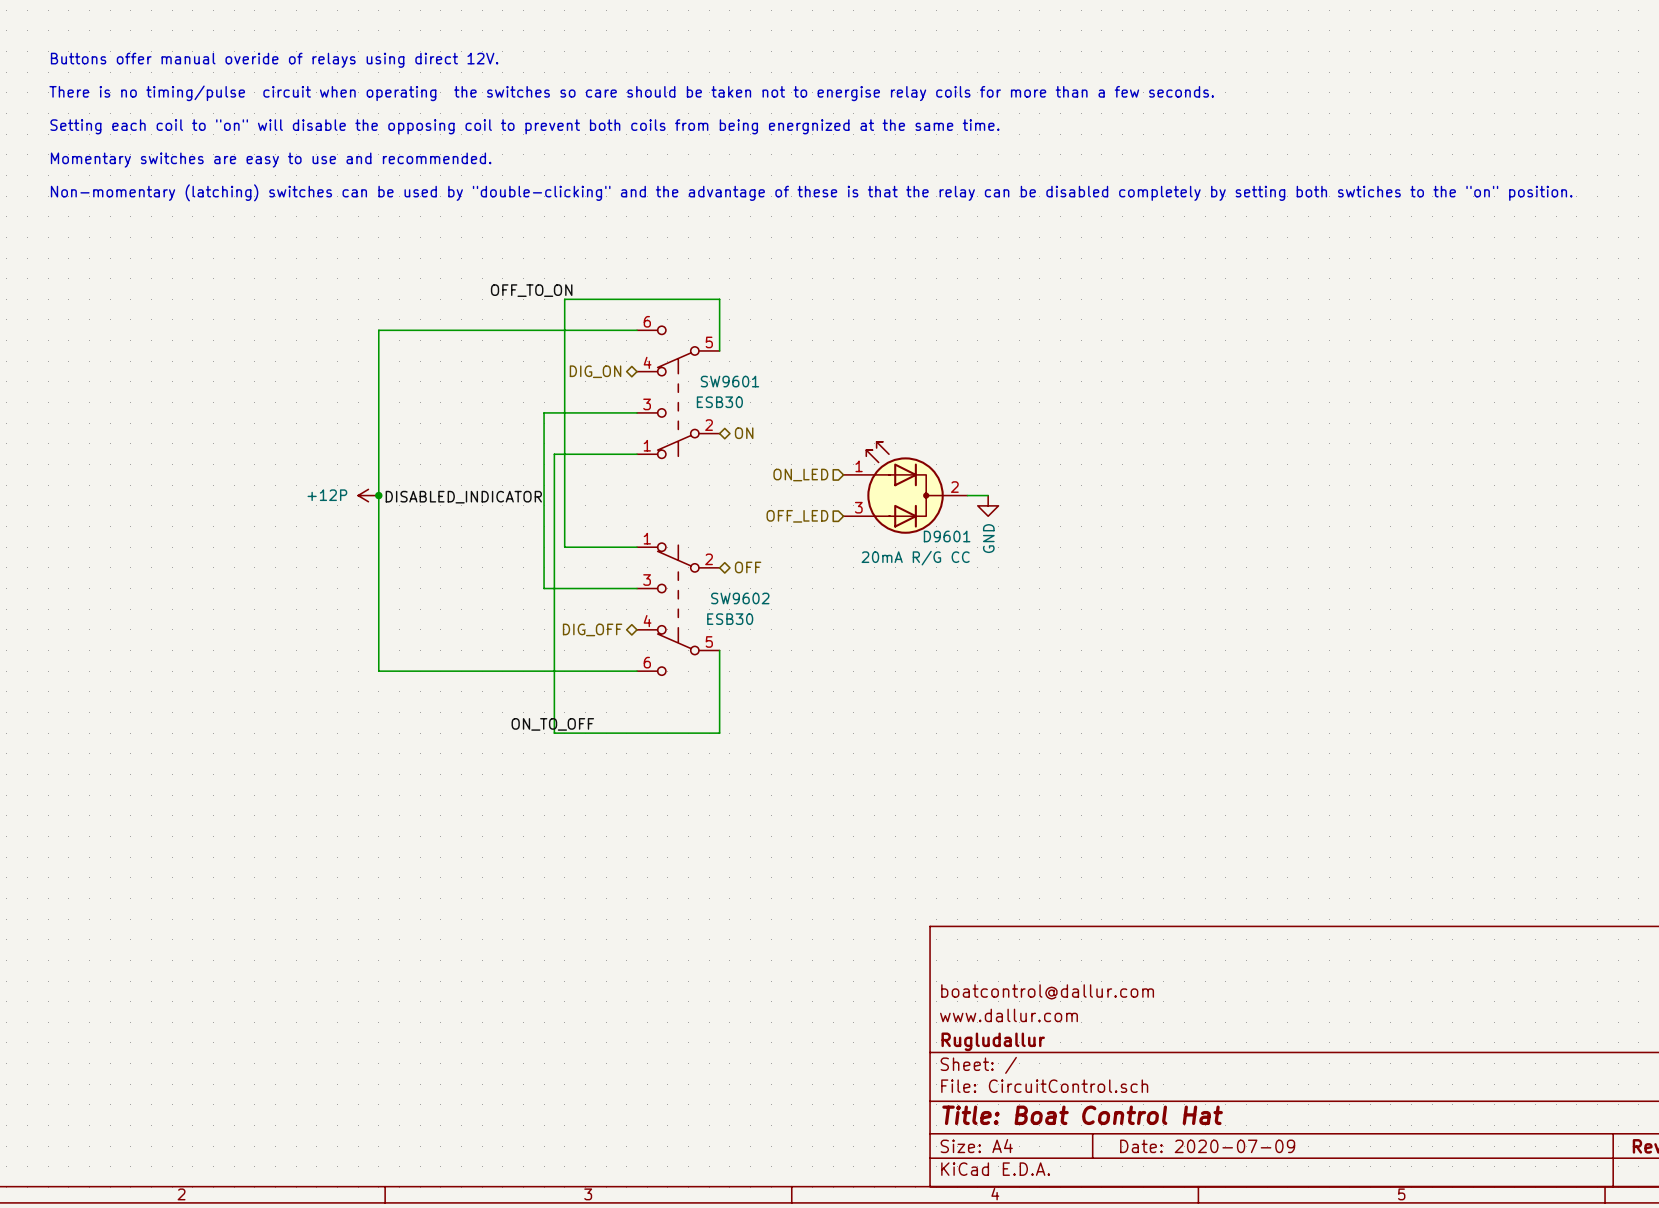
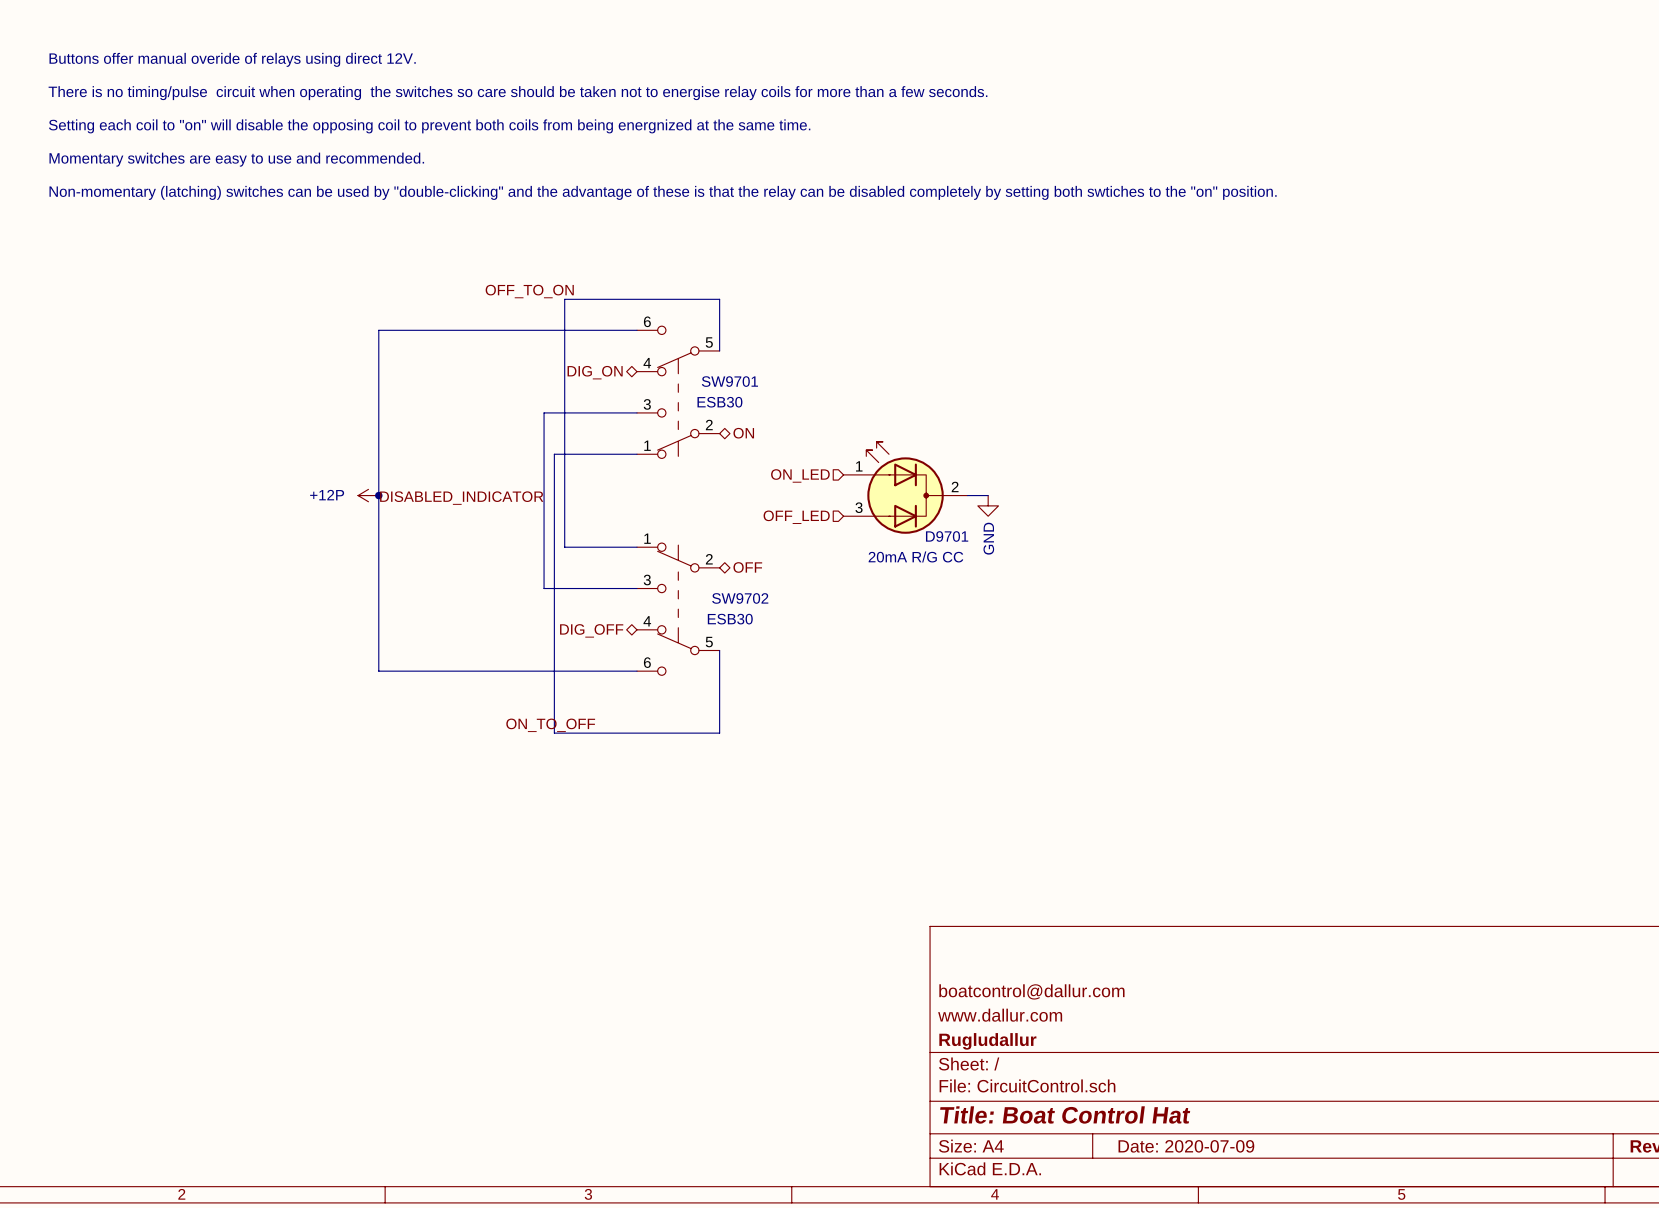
SW9601 name: SW9601 (729, 381) -> SW9701 (729, 381)
D9601 name: D9601 (947, 536) -> D9701 (947, 536)
SW9602 name: SW9602 (740, 598) -> SW9702 (740, 598)

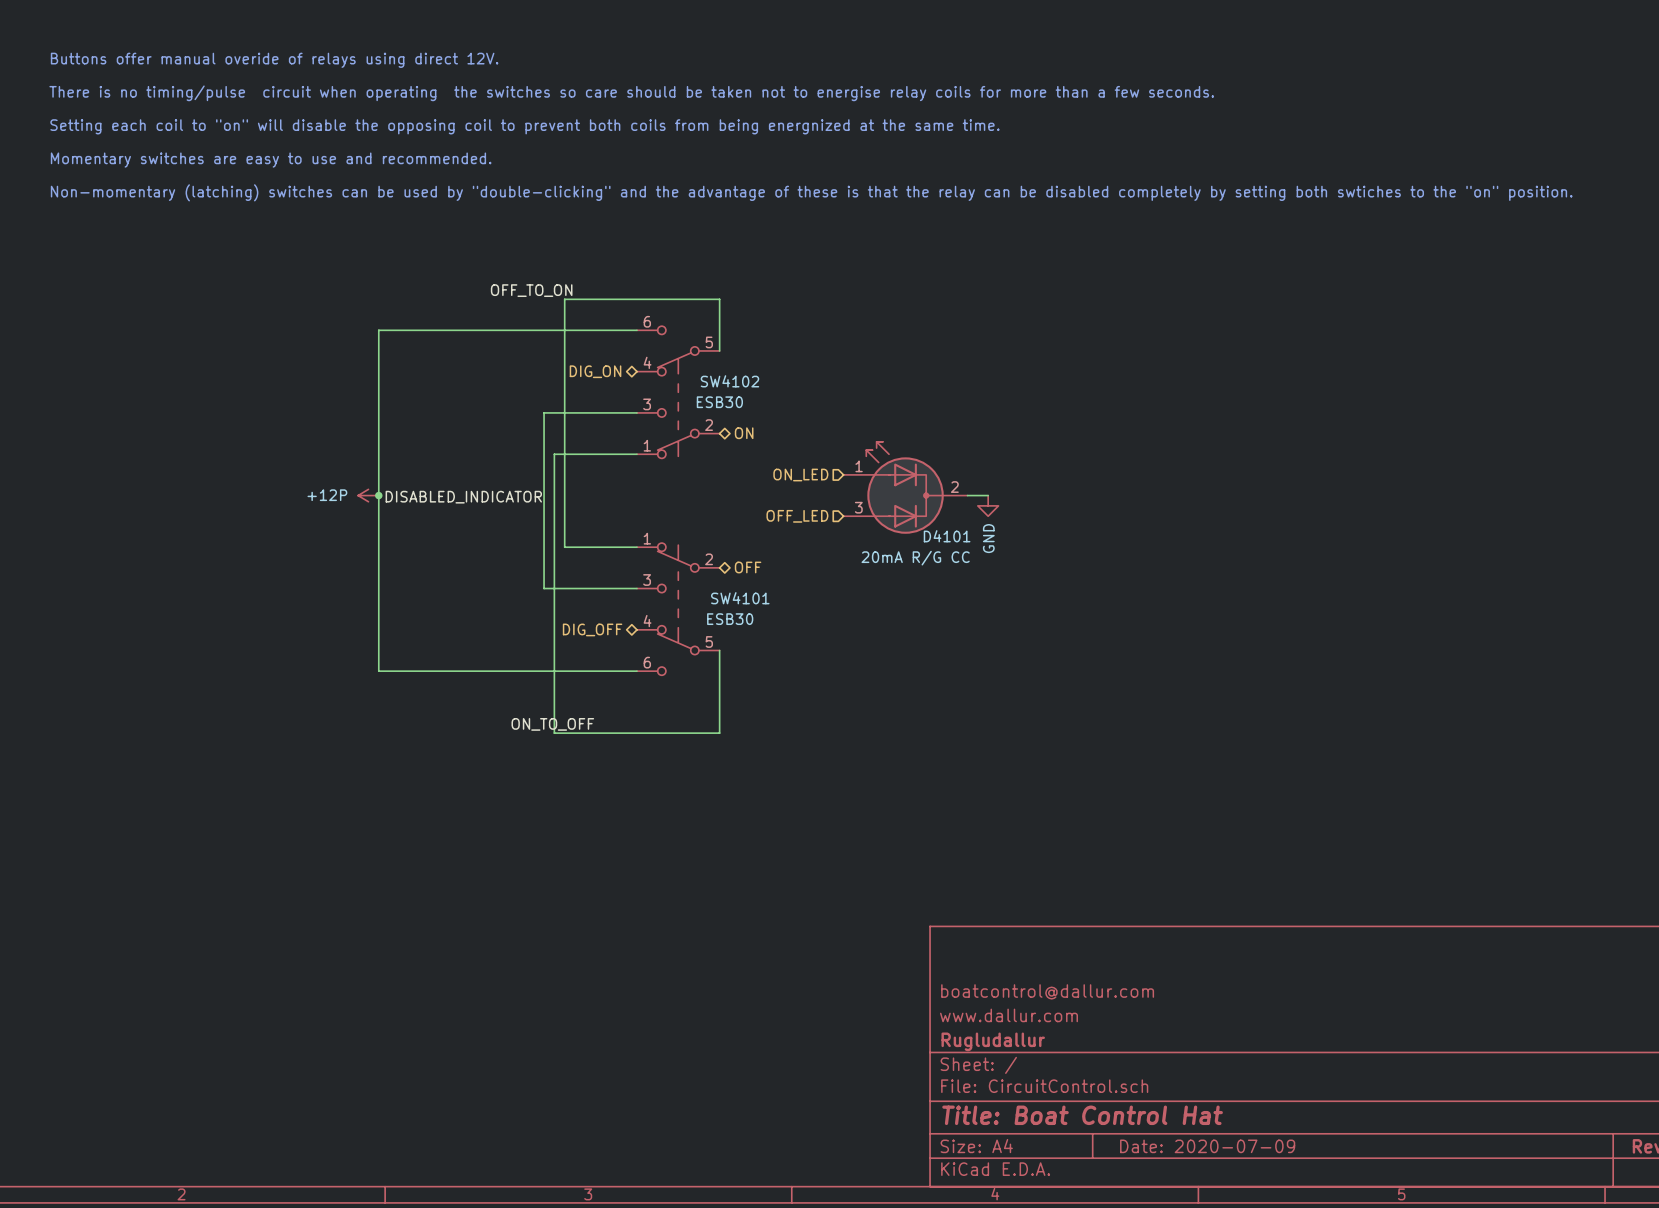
SW9701 name: SW9701 (729, 381) -> SW4102 (729, 381)
D9701 name: D9701 (947, 536) -> D4101 (947, 536)
SW9702 name: SW9702 (740, 598) -> SW4101 (740, 598)

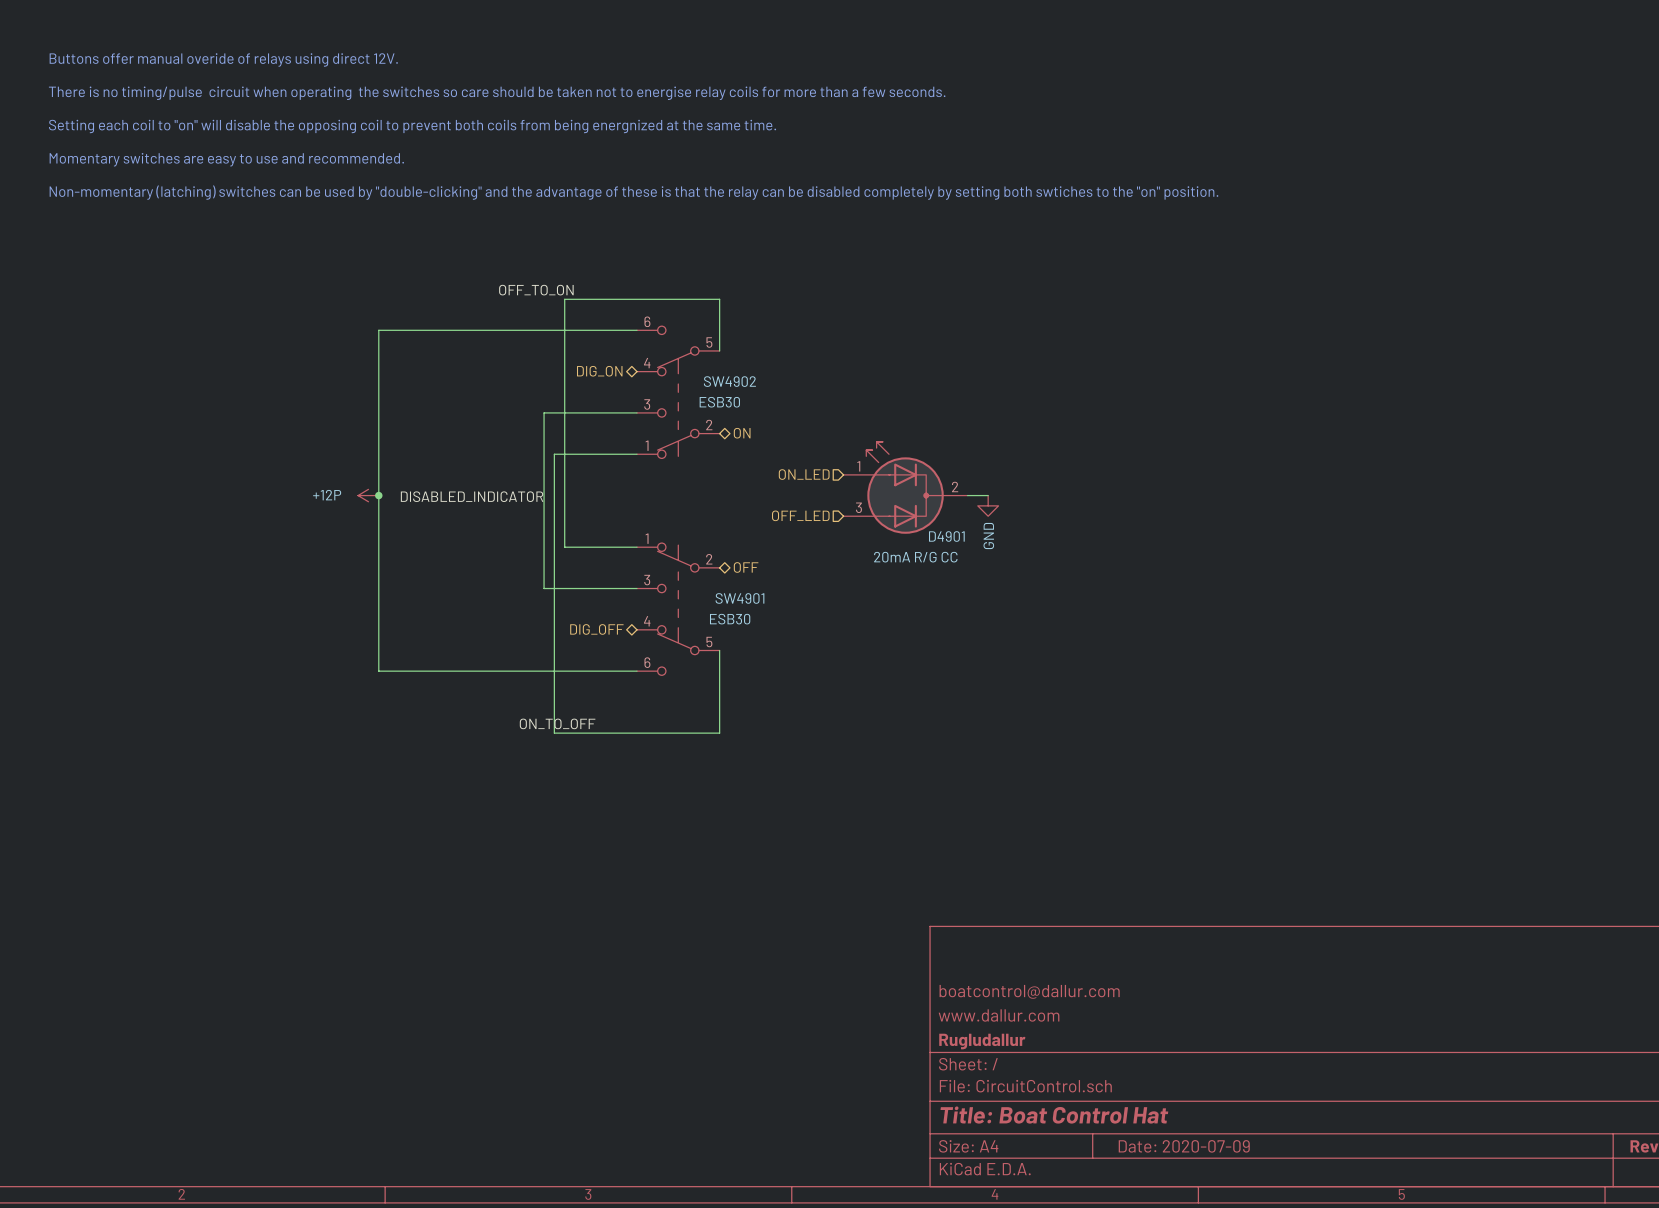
SW4102 name: SW4102 (729, 381) -> SW4902 (729, 381)
D4101 name: D4101 (947, 536) -> D4901 (946, 536)
SW4101 name: SW4101 (740, 598) -> SW4901 (739, 598)

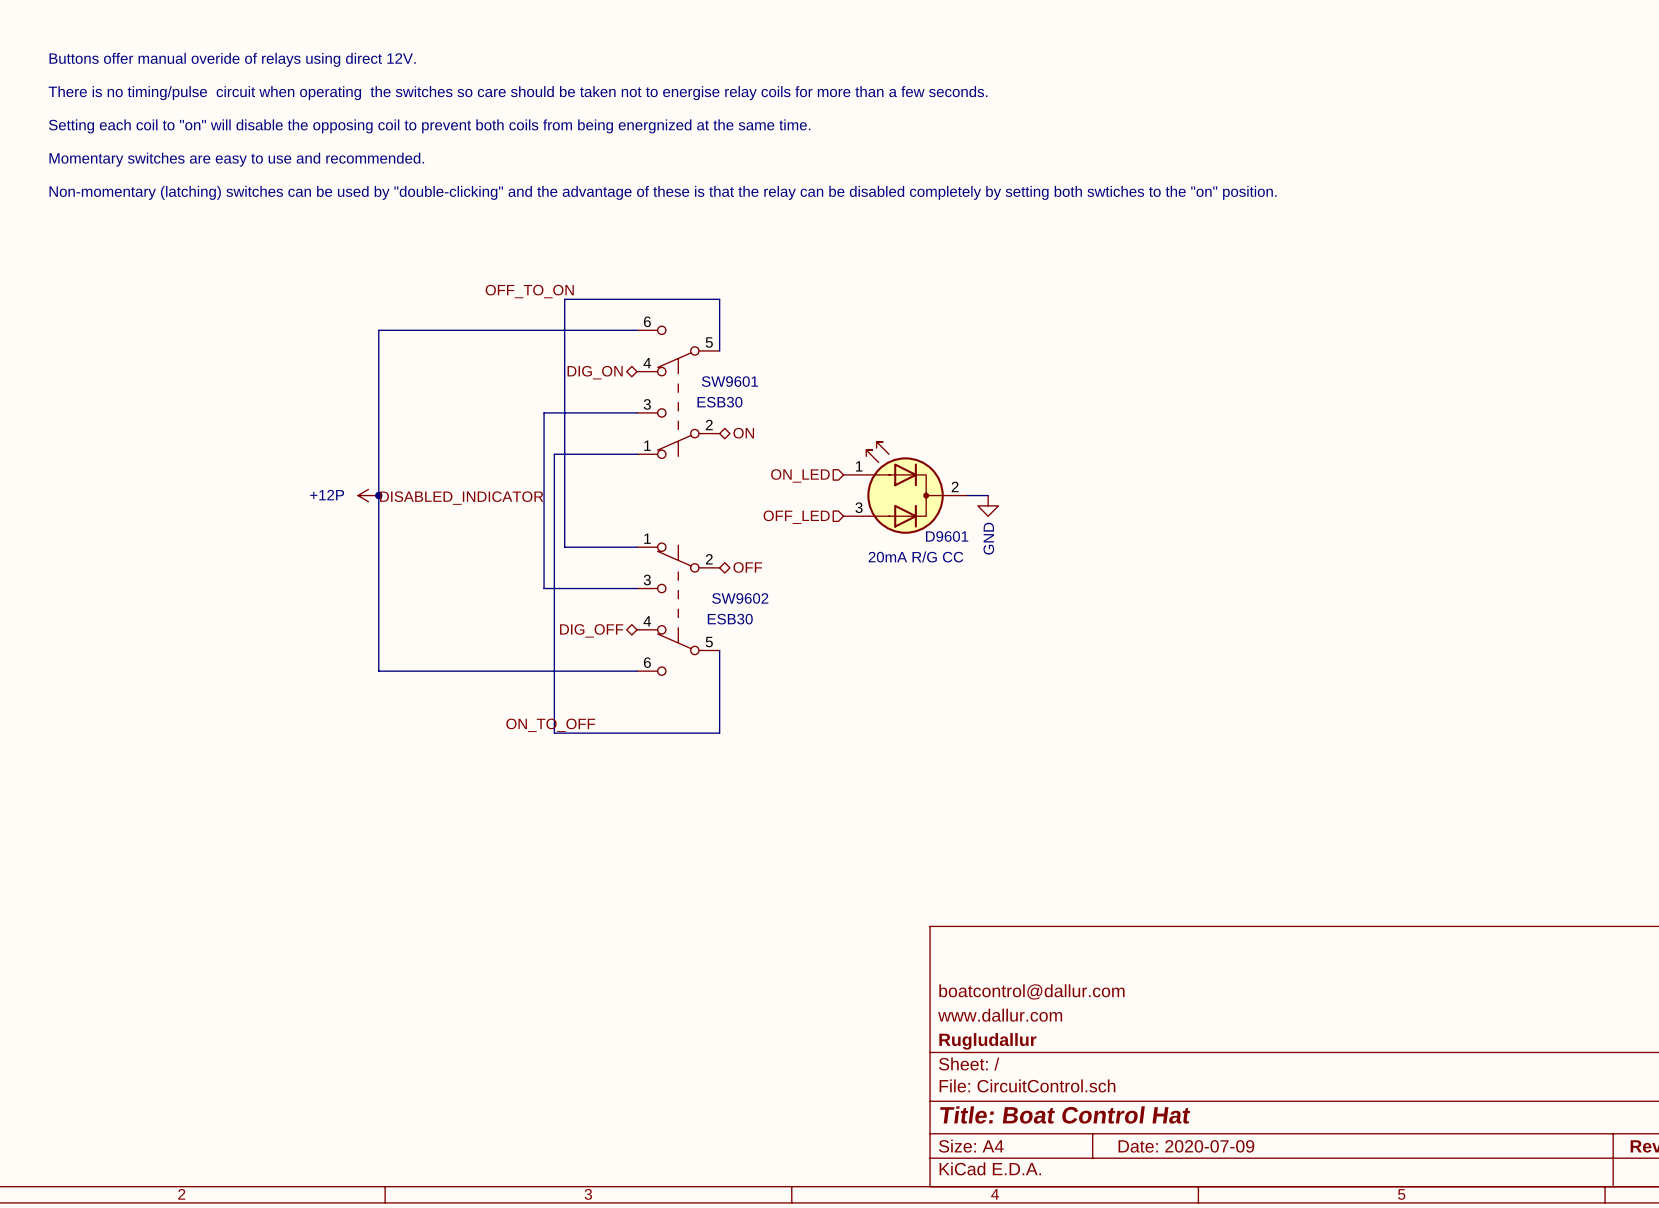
SW4902 name: SW4902 (729, 381) -> SW9601 (729, 381)
D4901 name: D4901 (946, 536) -> D9601 (947, 536)
SW4901 name: SW4901 (739, 598) -> SW9602 (740, 598)

